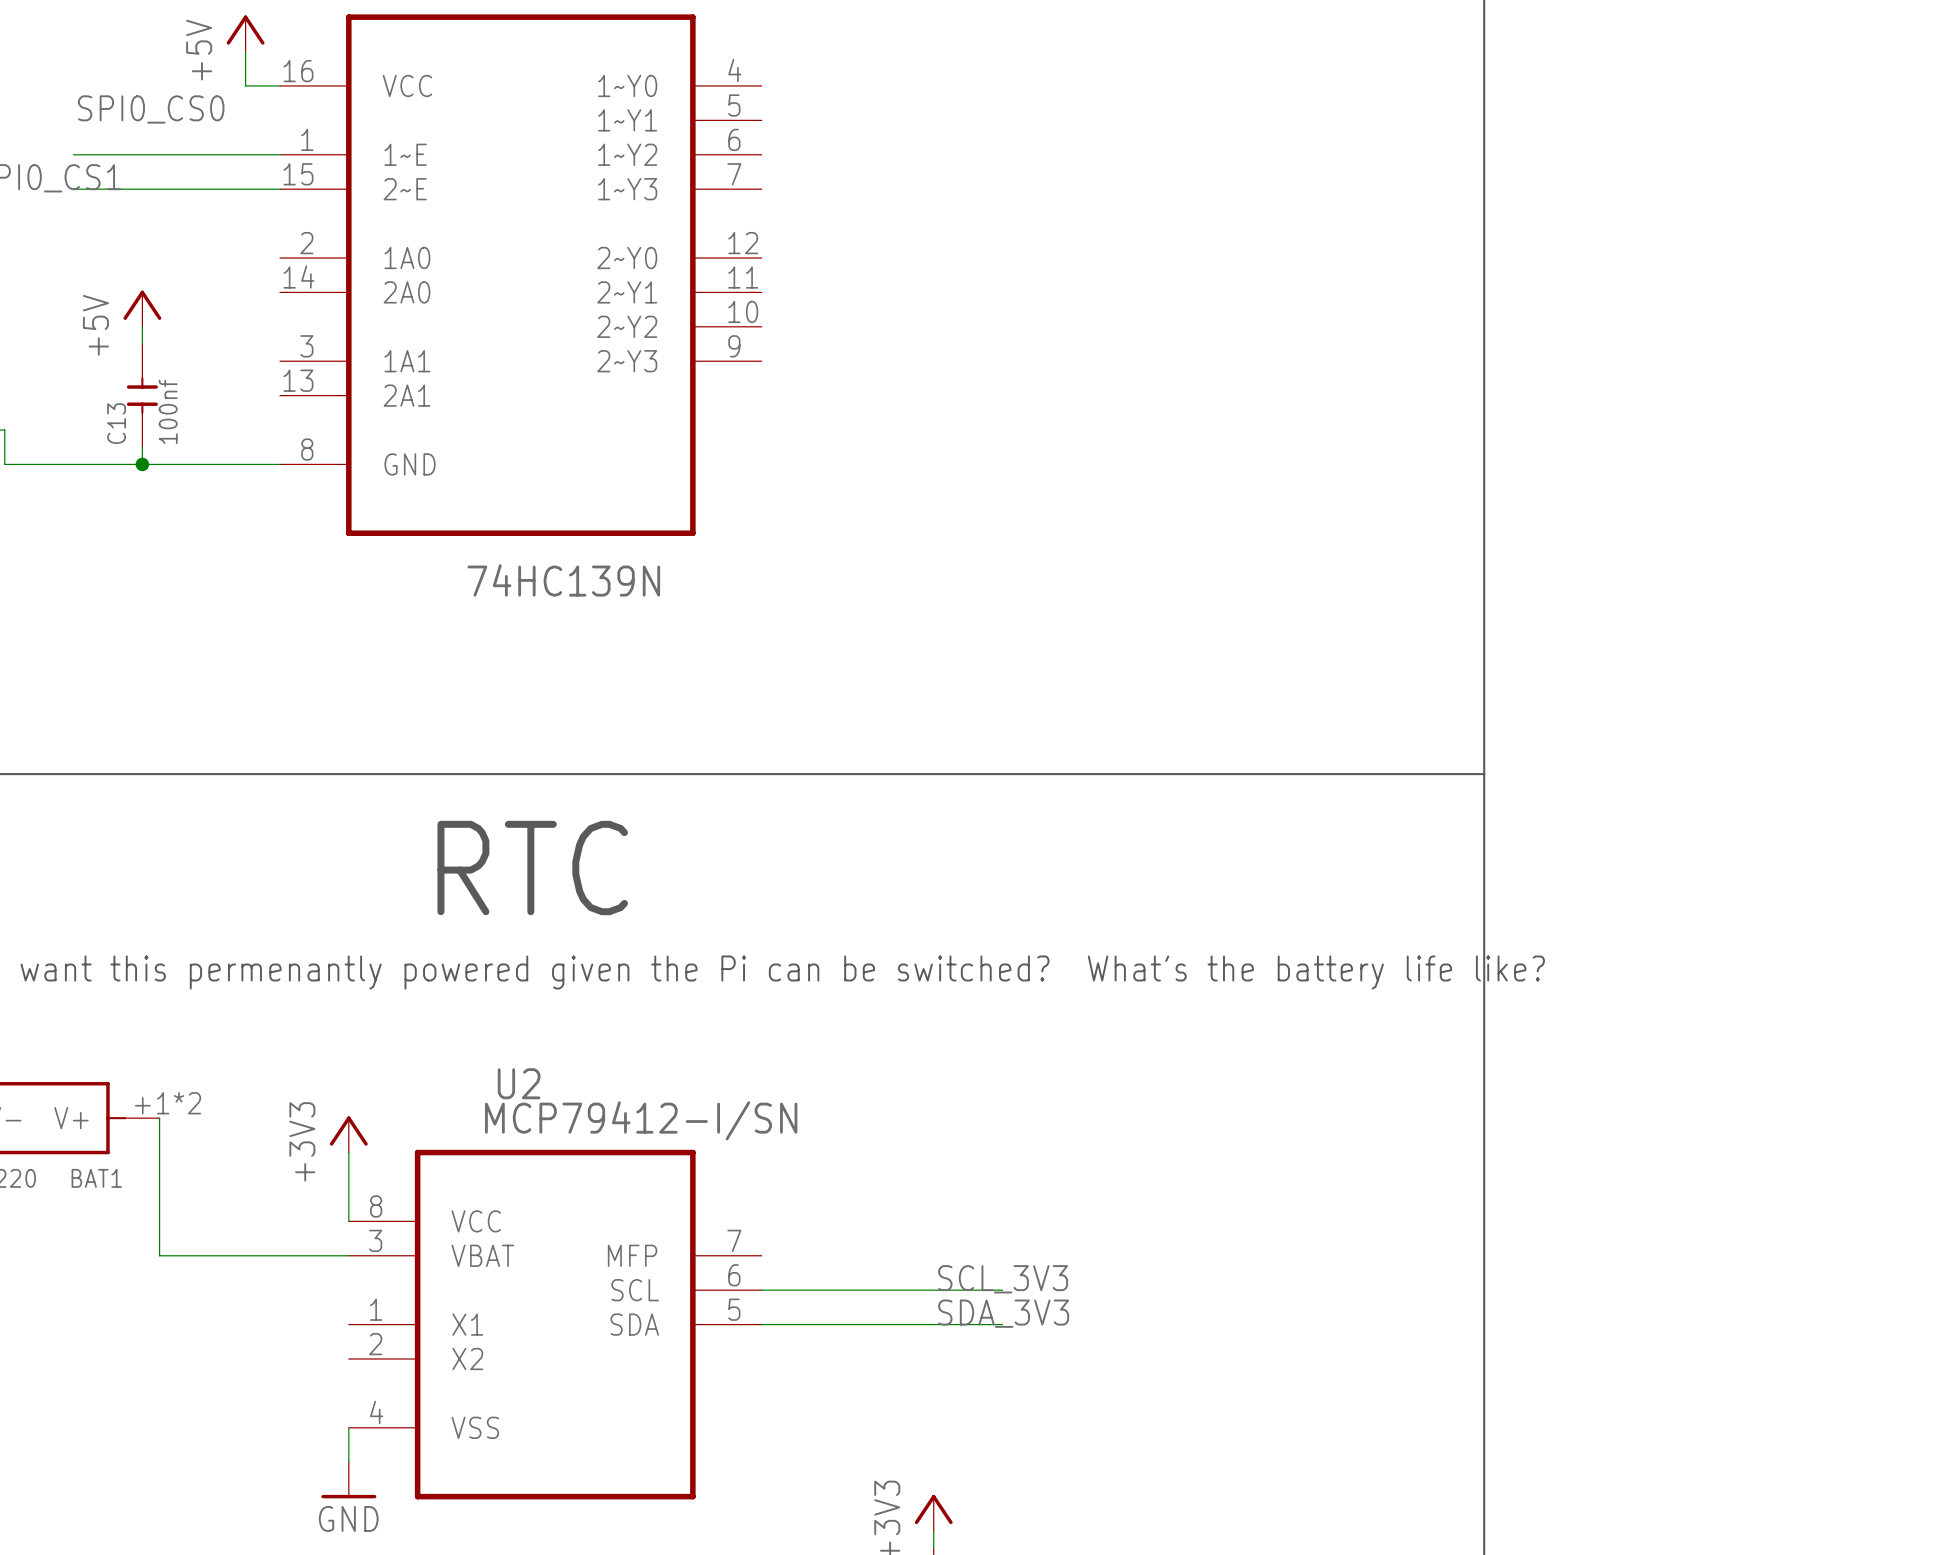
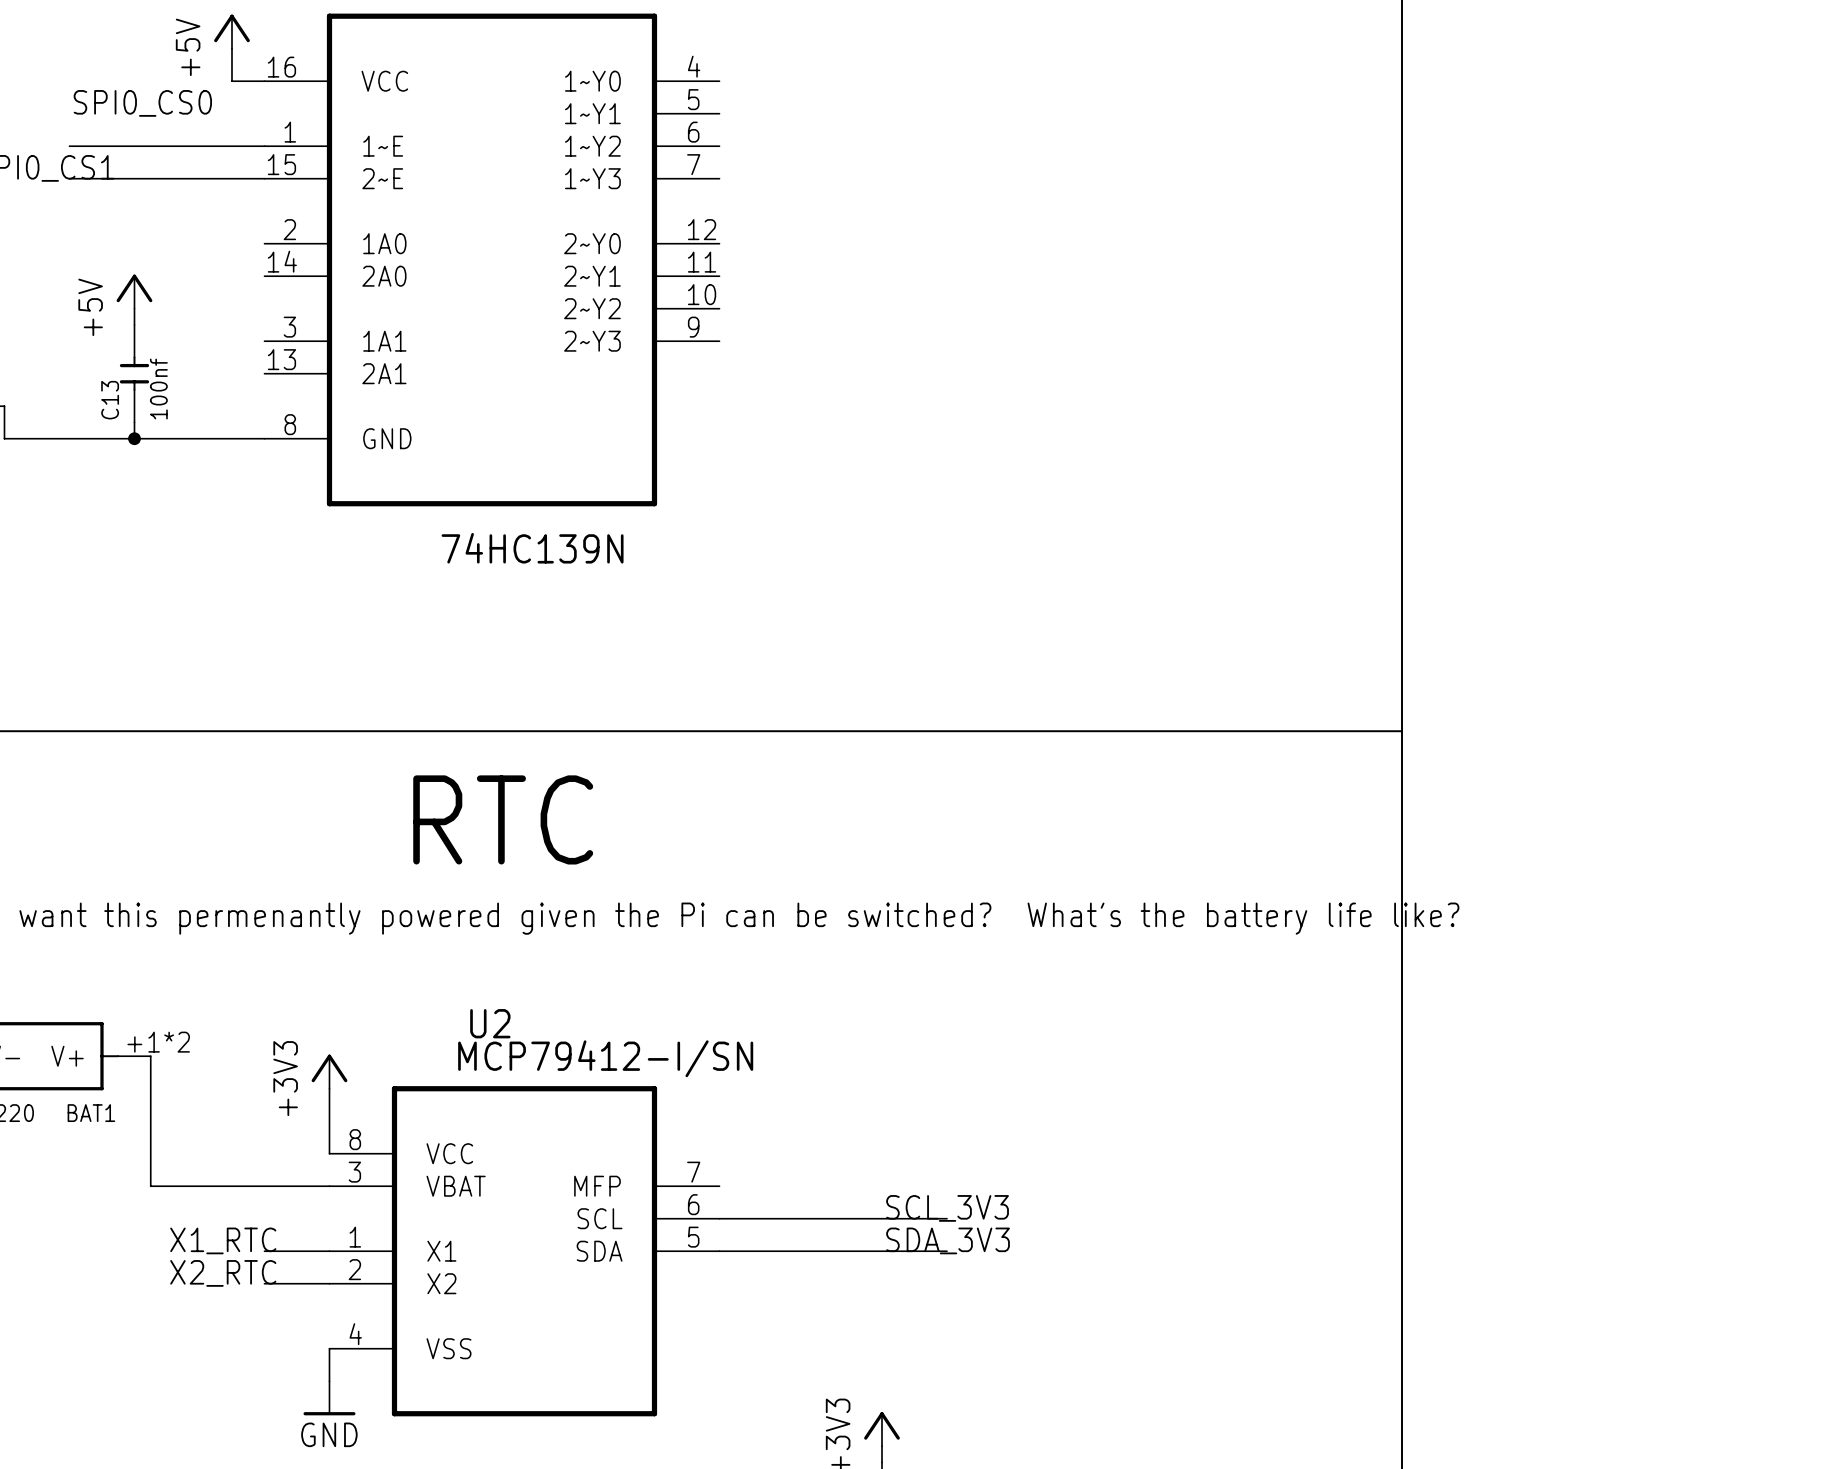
label: none -> X1_RTC (223, 1240)
wire: none -> (264, 1251) (329, 1251)
label: none -> X2_RTC (223, 1273)
wire: none -> (264, 1283) (329, 1283)

